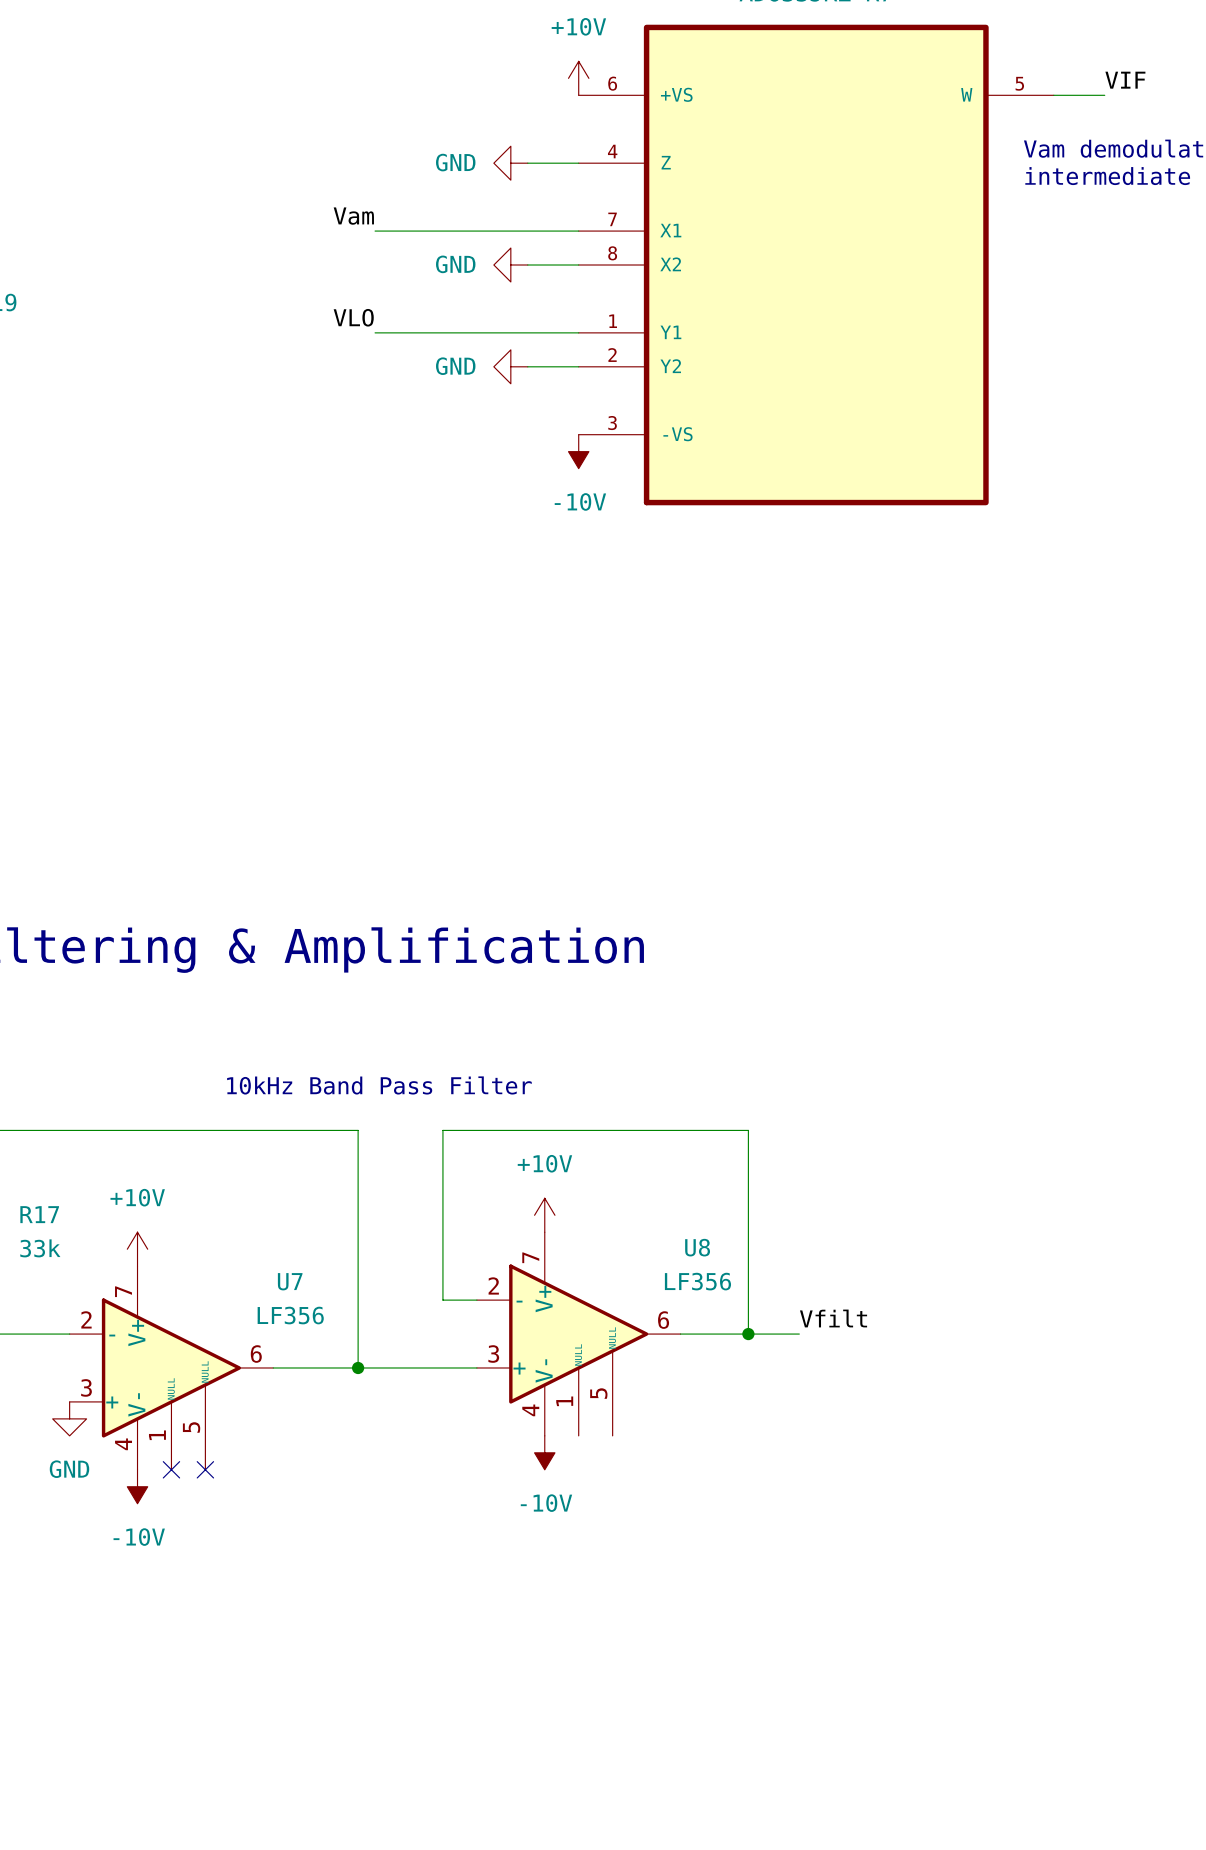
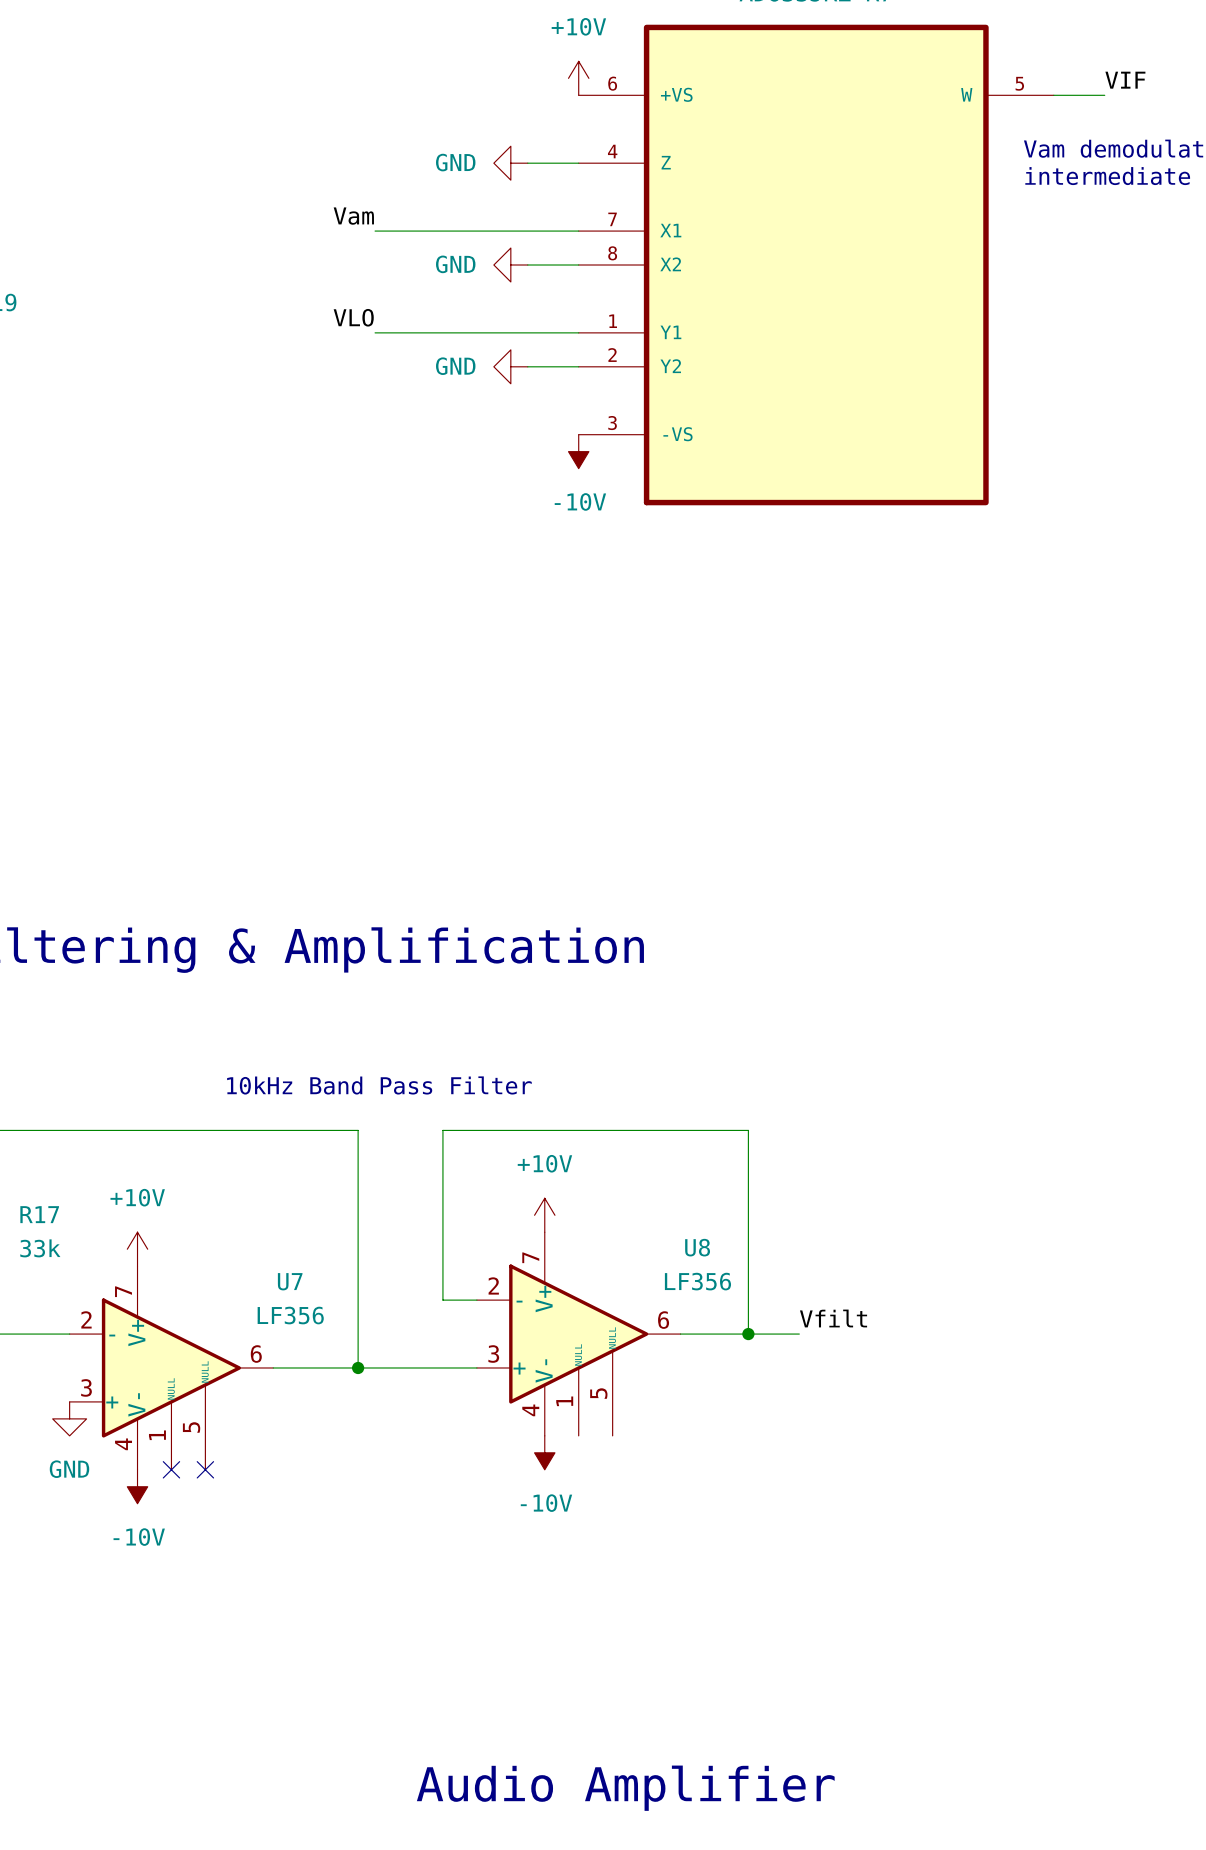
text: none -> Audio Amplifier (625, 1788)

